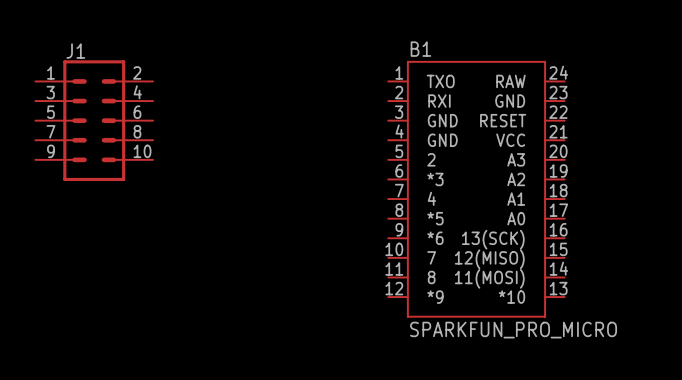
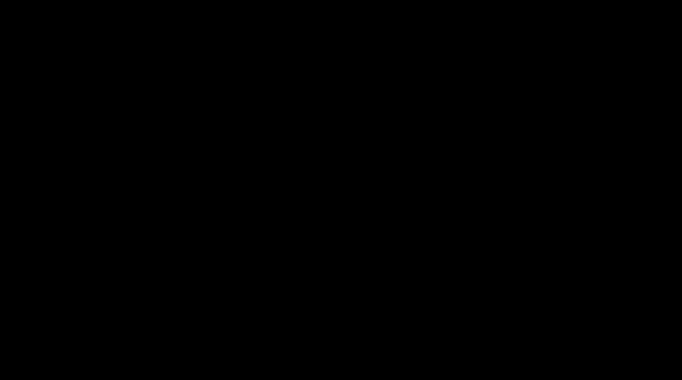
J1: (94, 120) -> none
B1: SPARKFUN_PRO_MICRO (476, 189) -> none

